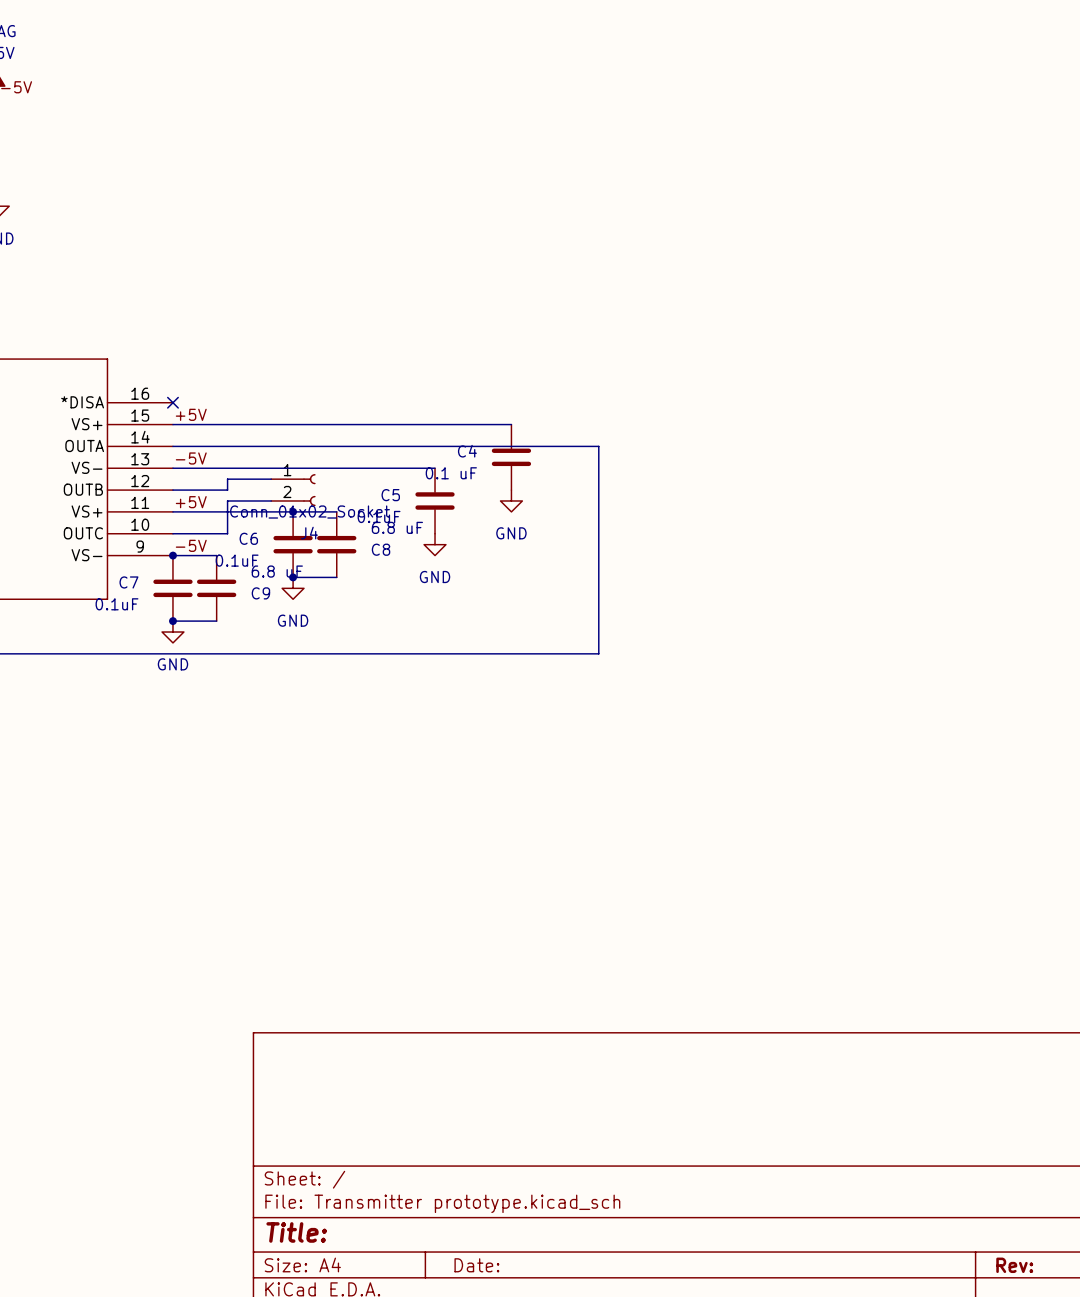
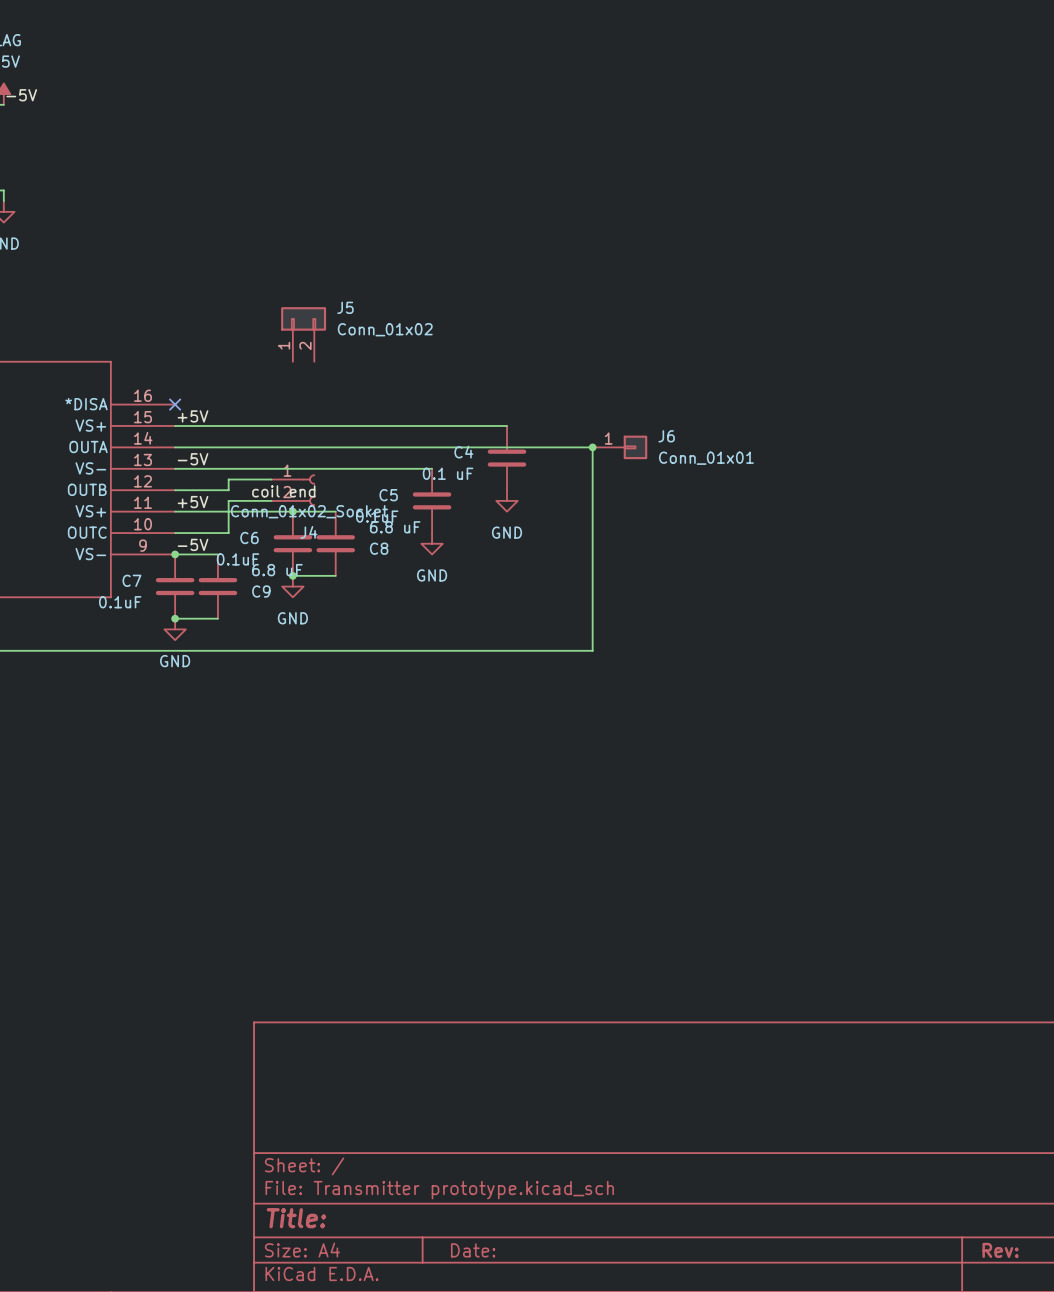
J5: none -> Conn_01x02 (303, 334)
junction: none -> (592, 447)
J6: none -> Conn_01x01 (619, 447)
label: none -> coil end (283, 491)

